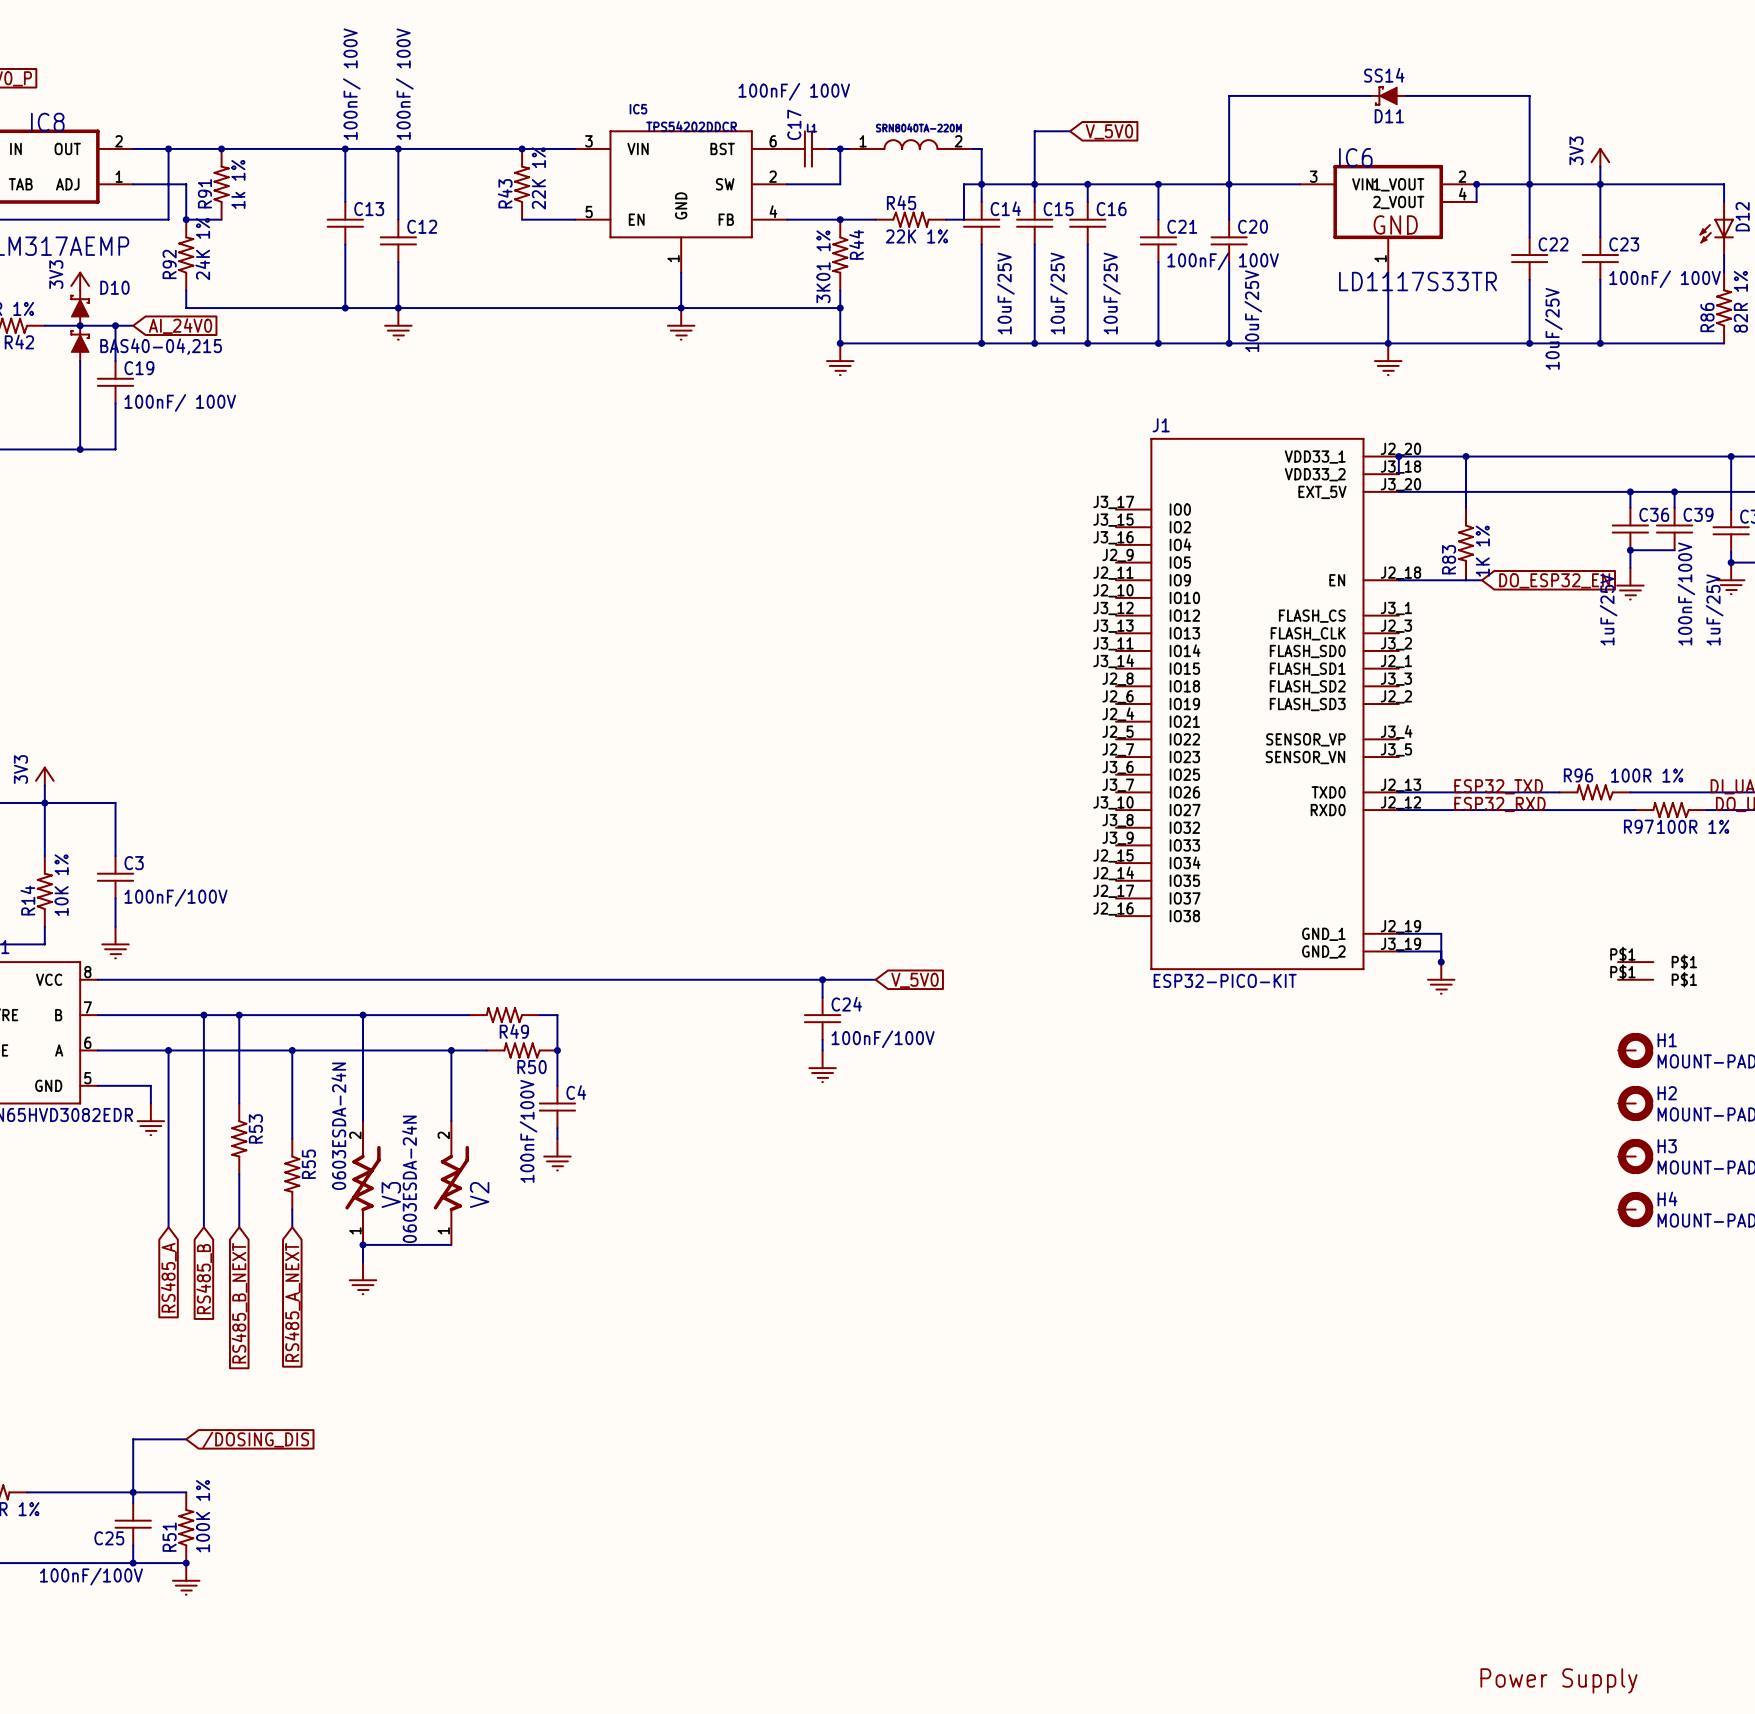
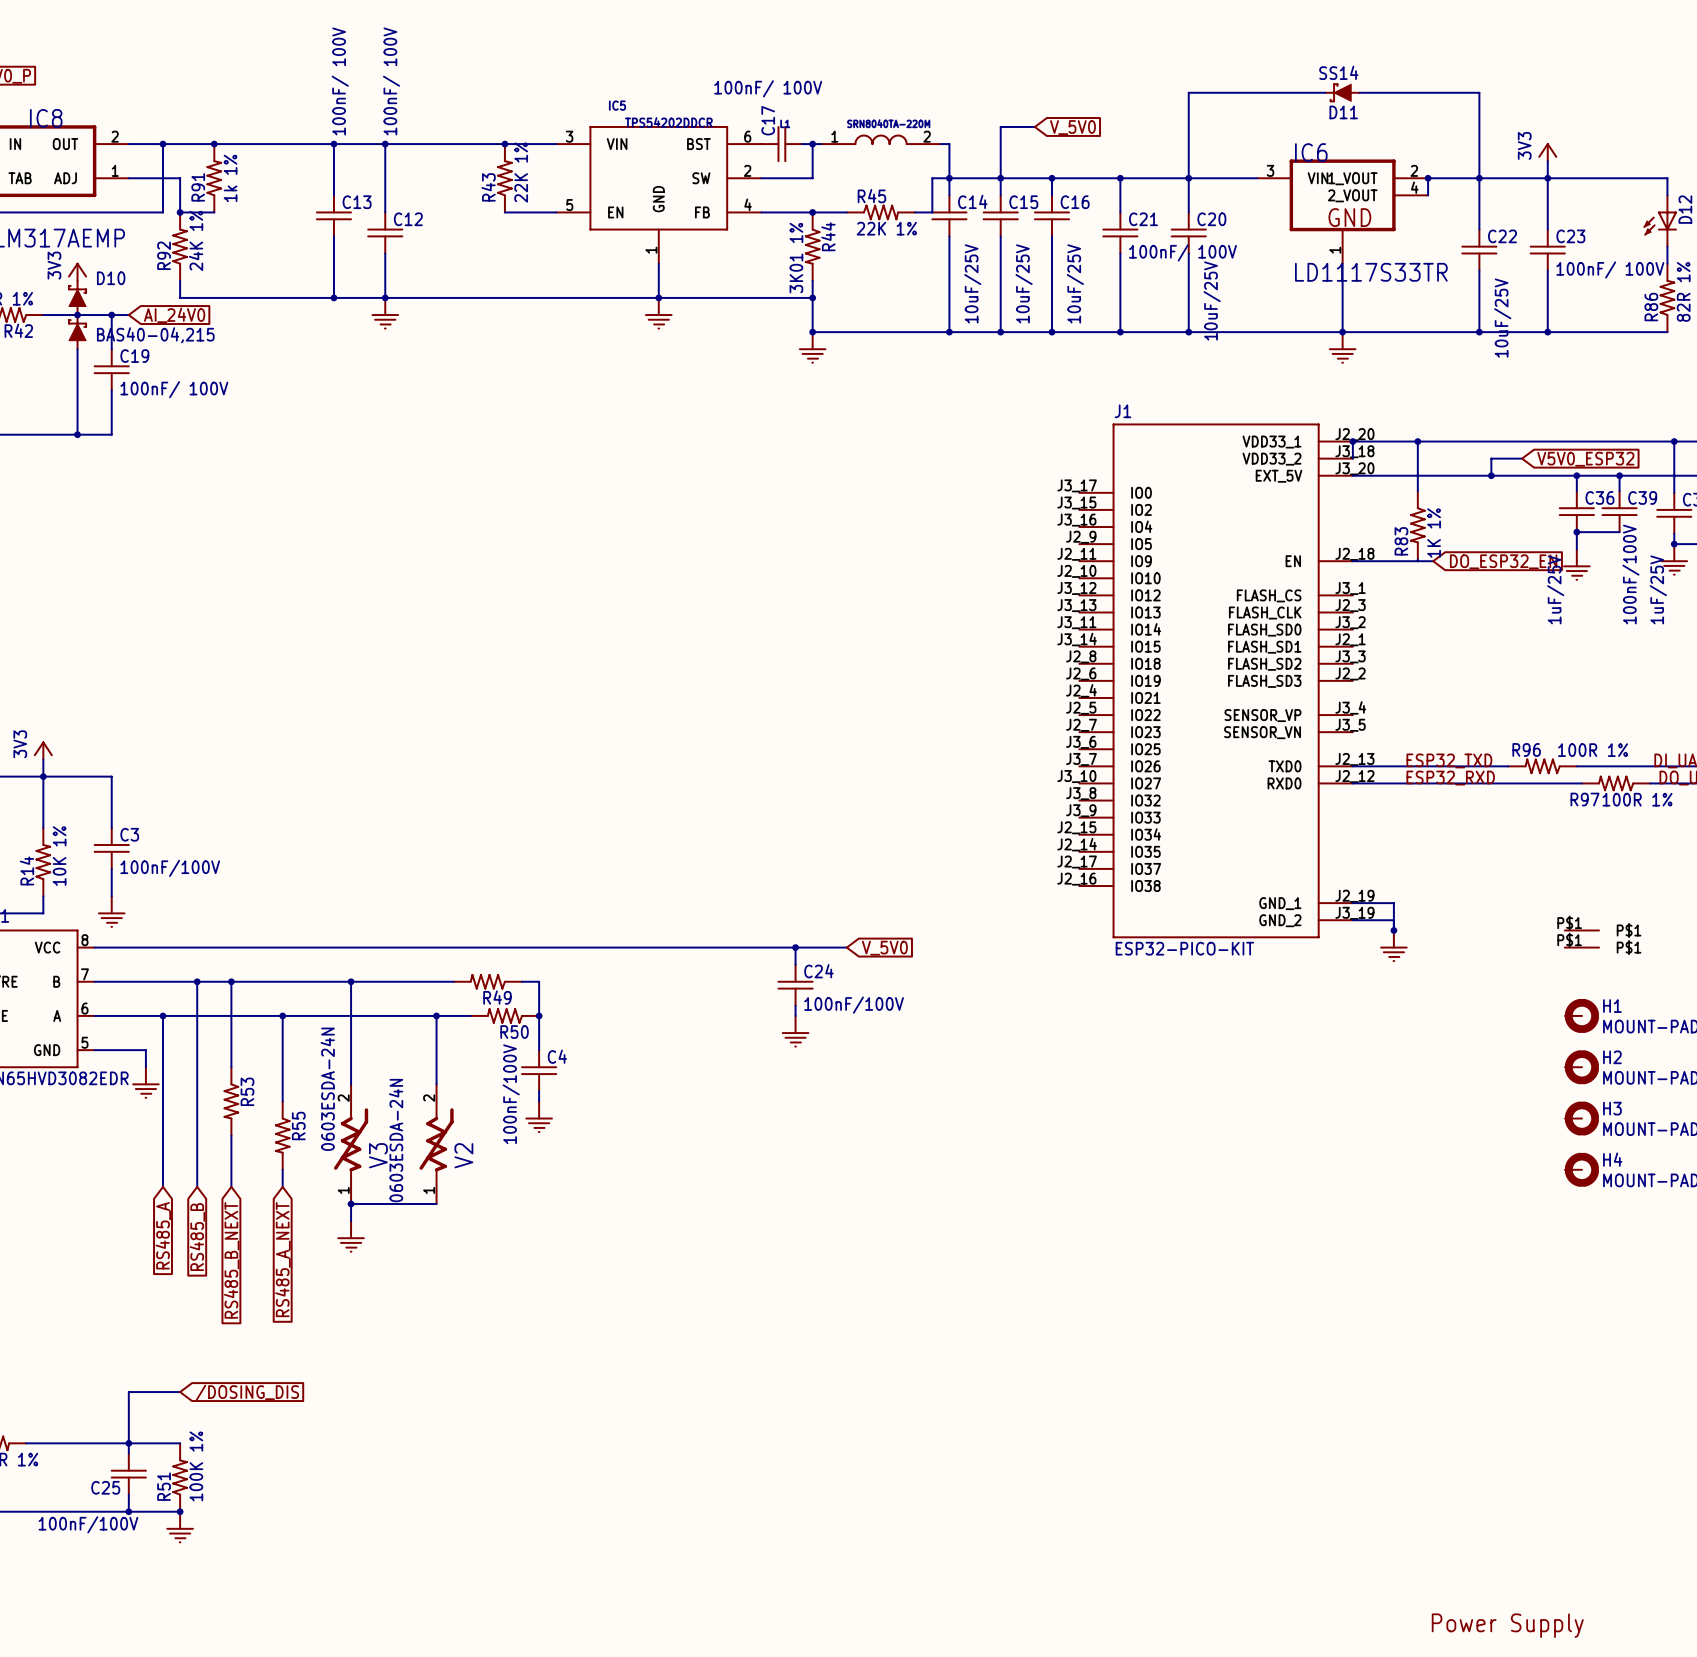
wire: none -> (1522, 458) (1491, 458) (1491, 475)
global label: none -> V5V0_ESP32 (1585, 459)
junction: none -> (1491, 475)

